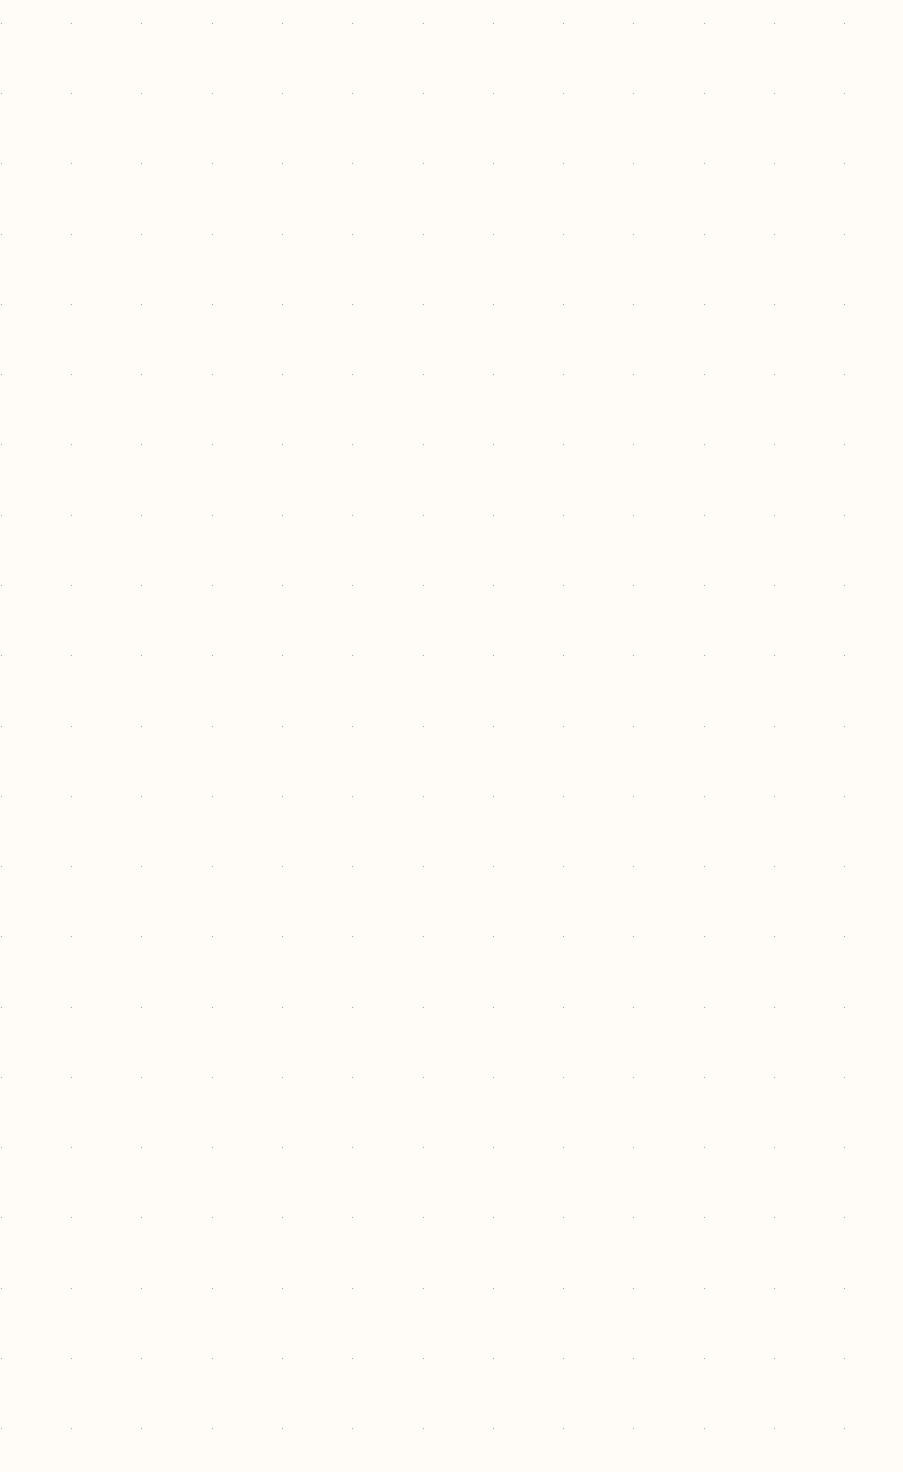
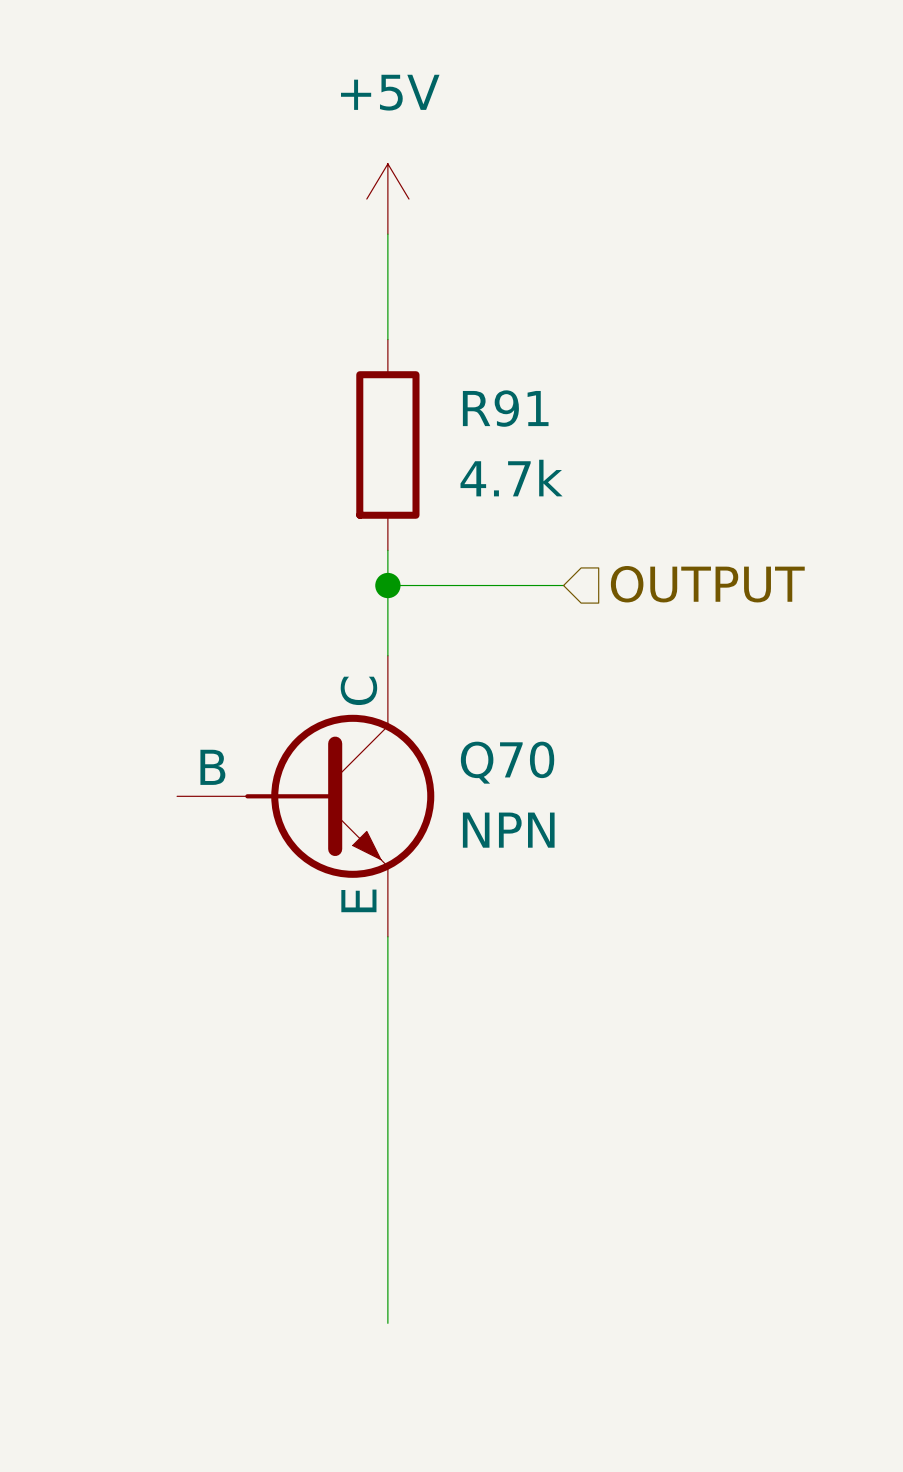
power symbol: none -> +5V (387, 199)
wire: none -> (387, 234) (387, 339)
R91: none -> 4.7k (387, 444)
wire: none -> (387, 550) (387, 655)
hierarchical label: none -> OUTPUT (707, 584)
wire: none -> (387, 585) (563, 585)
junction: none -> (387, 585)
Q70: none -> NPN (305, 796)
wire: none -> (387, 936) (387, 1323)

